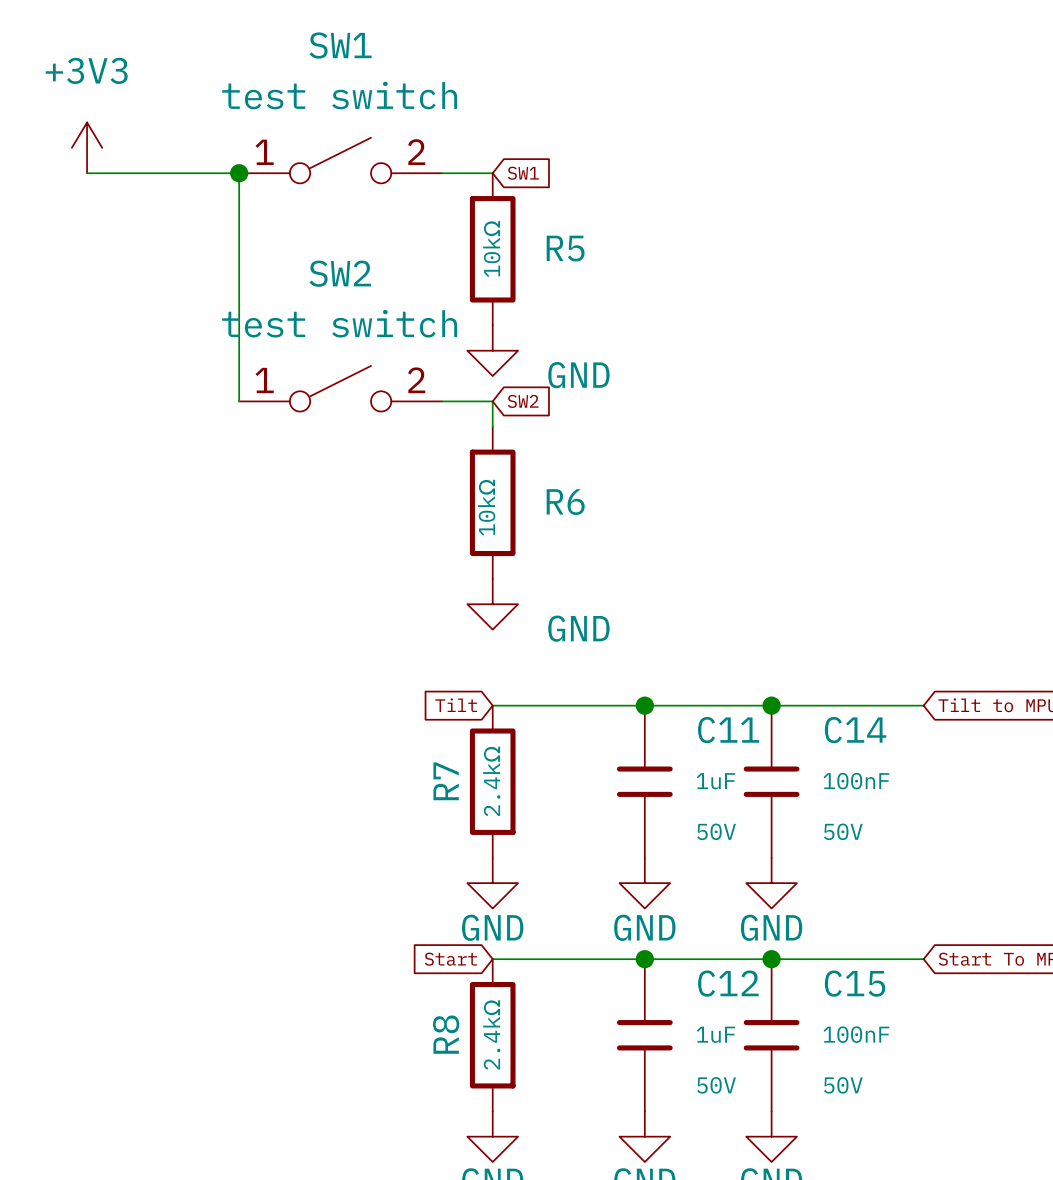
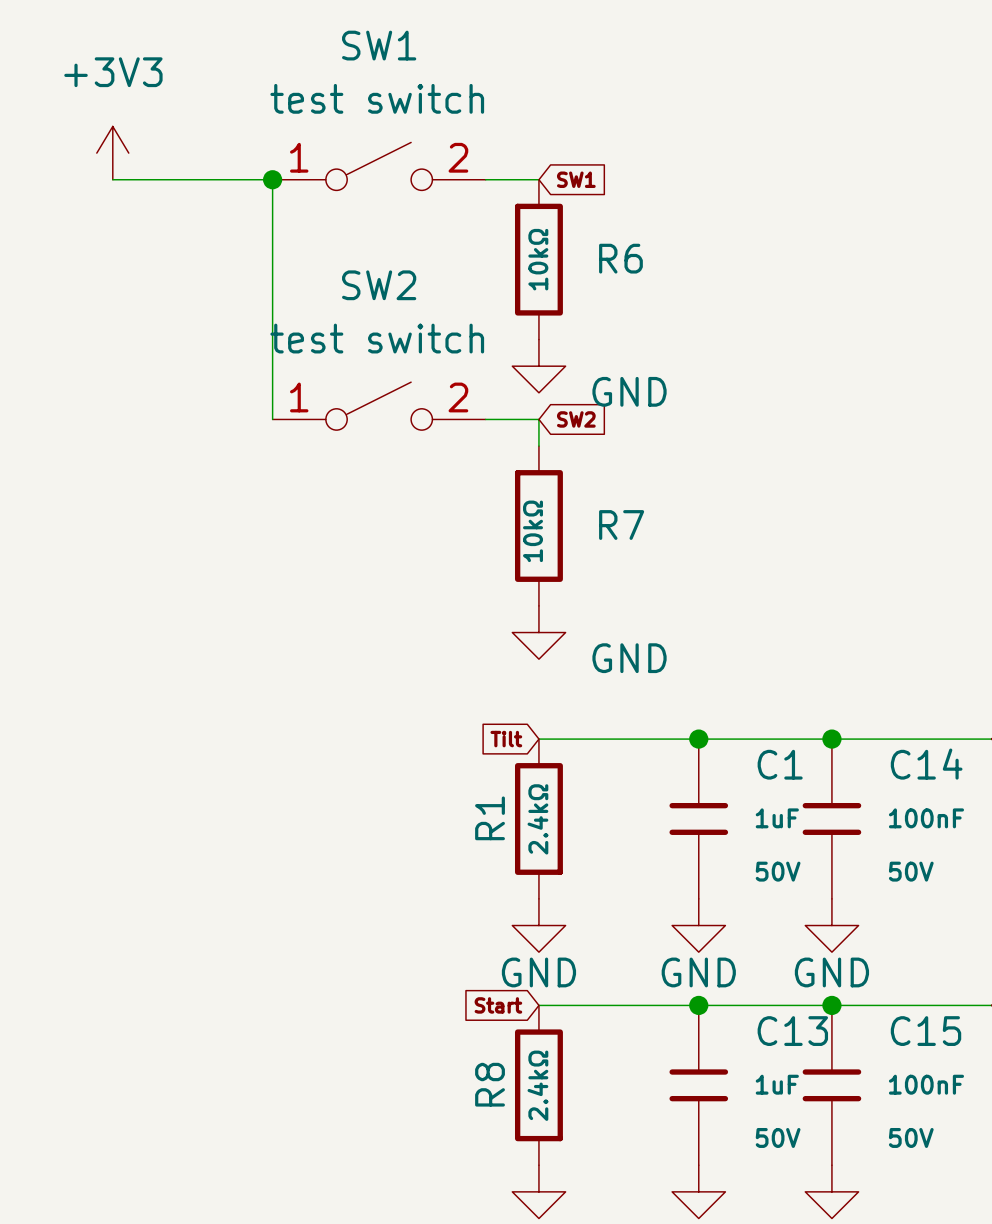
R5 name: R5 (565, 248) -> R6 (620, 258)
R6 name: R6 (565, 502) -> R7 (621, 525)
C11 name: C11 (728, 730) -> C1 (780, 764)
R7 name: R7 (446, 781) -> R1 (490, 818)
C12 name: C12 (728, 983) -> C13 (792, 1031)

